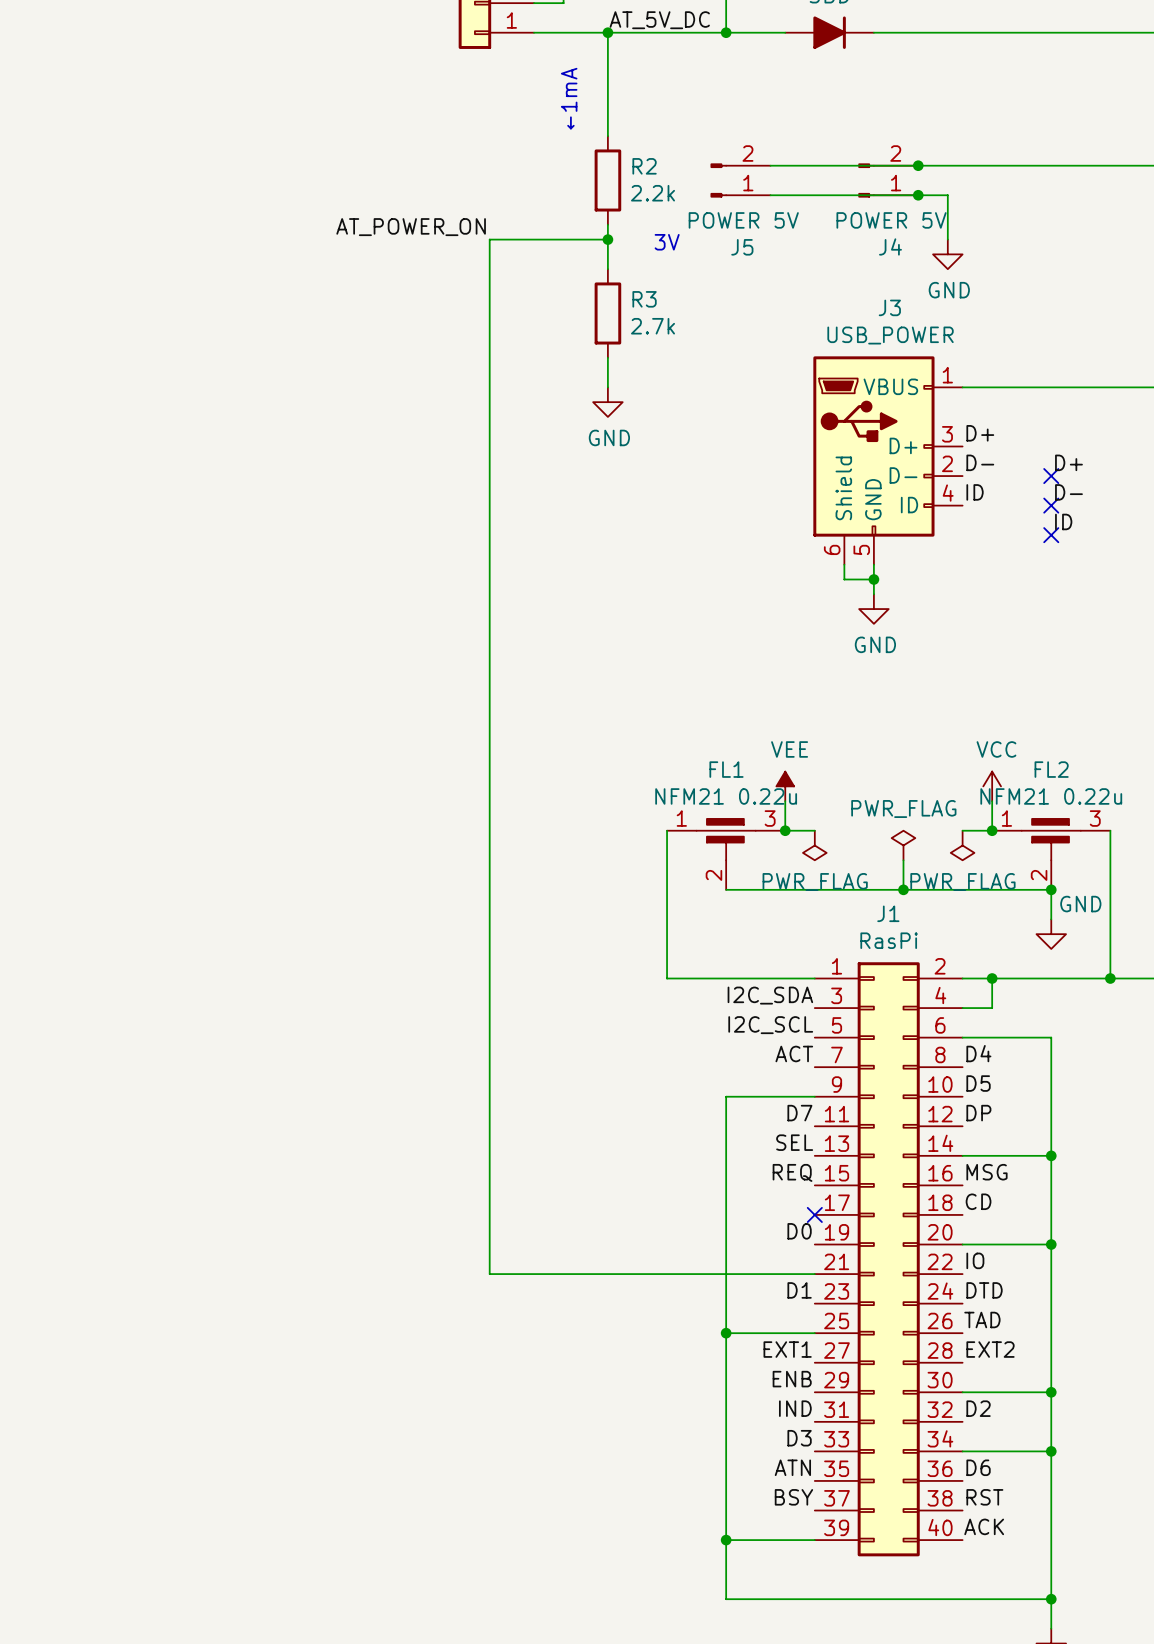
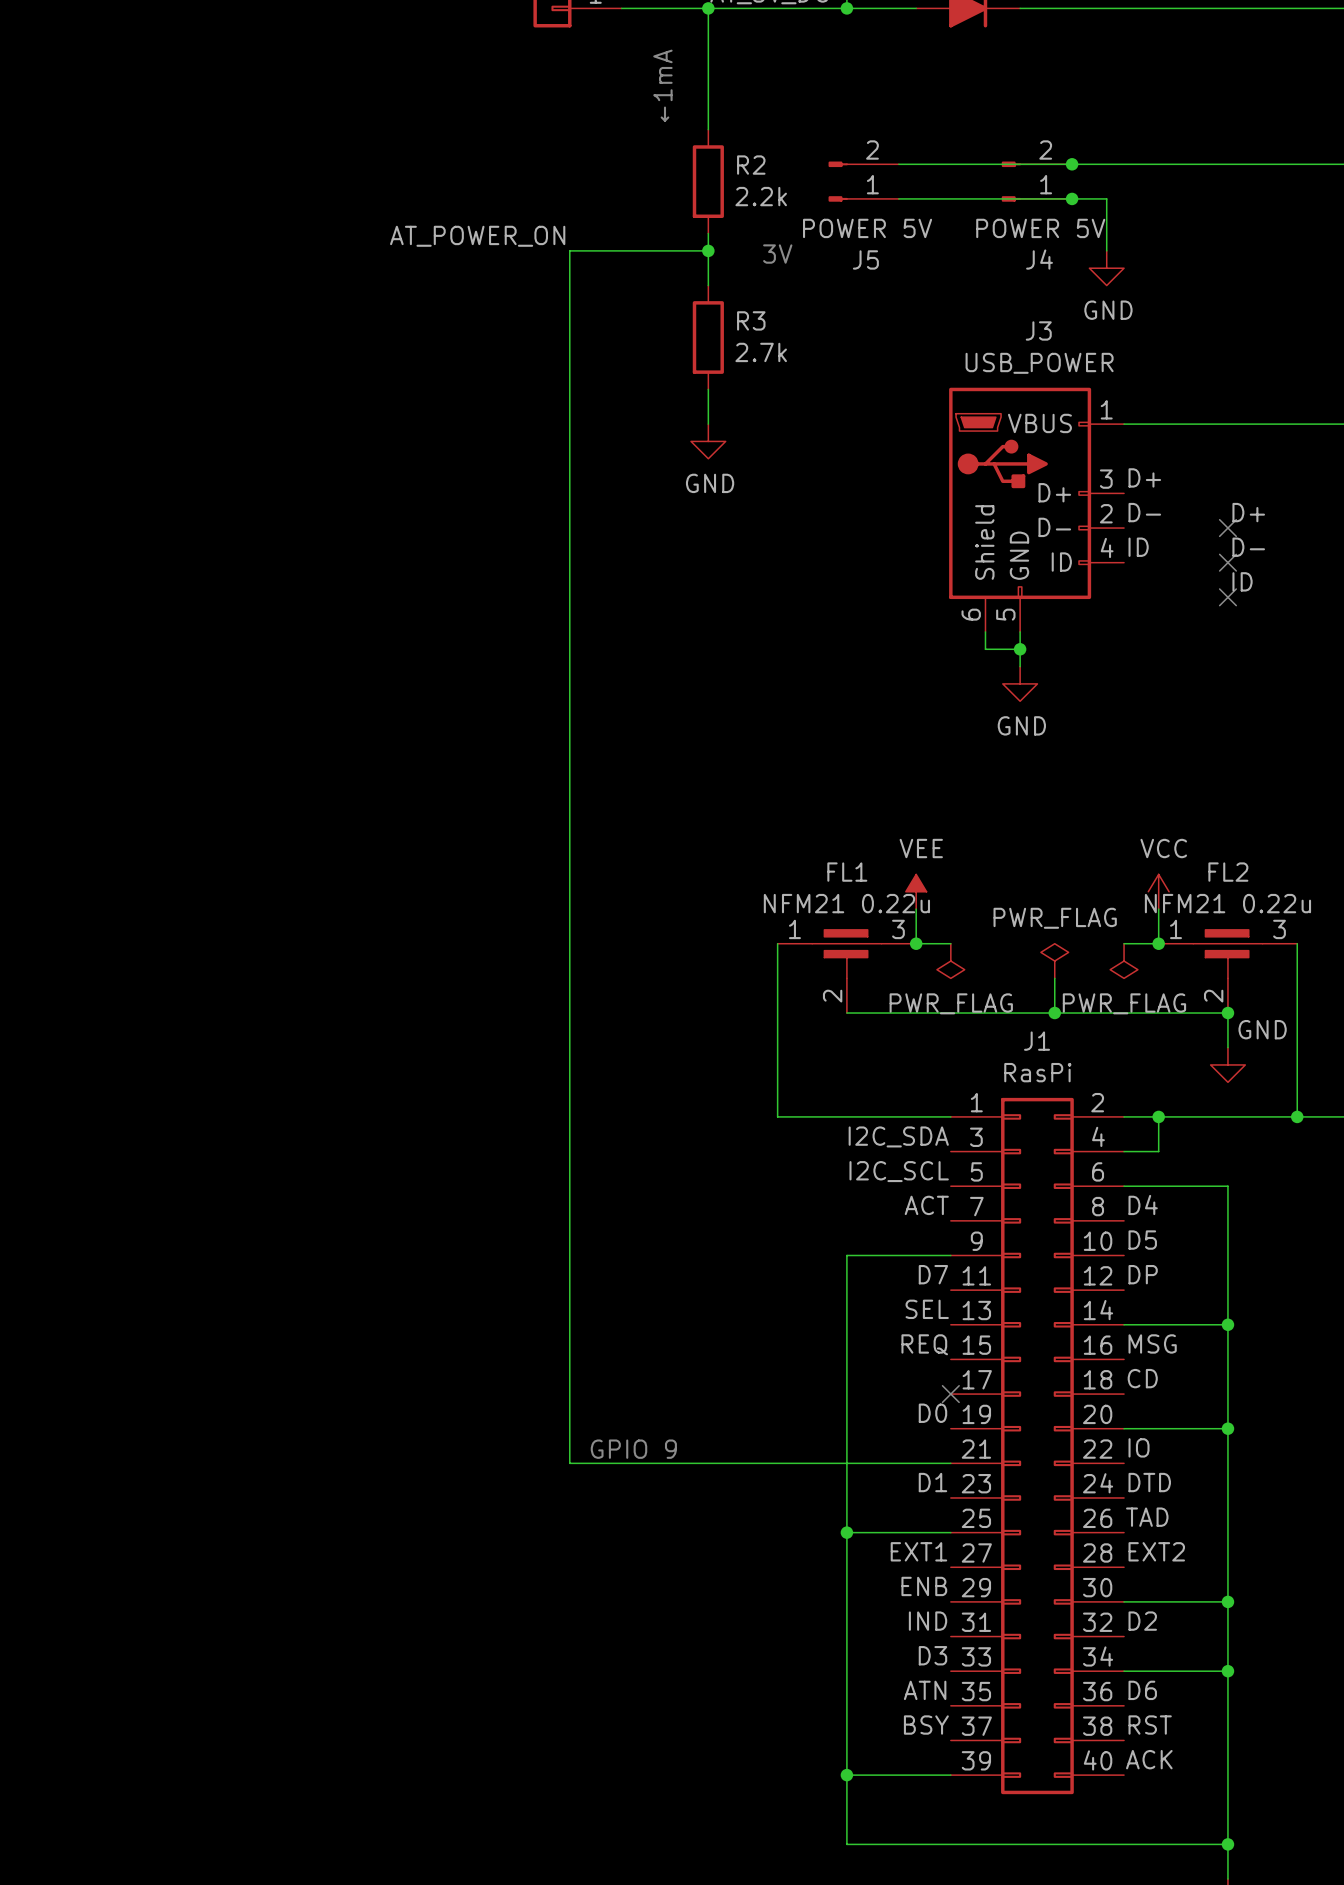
text: none -> GPIO 9 (633, 1449)

